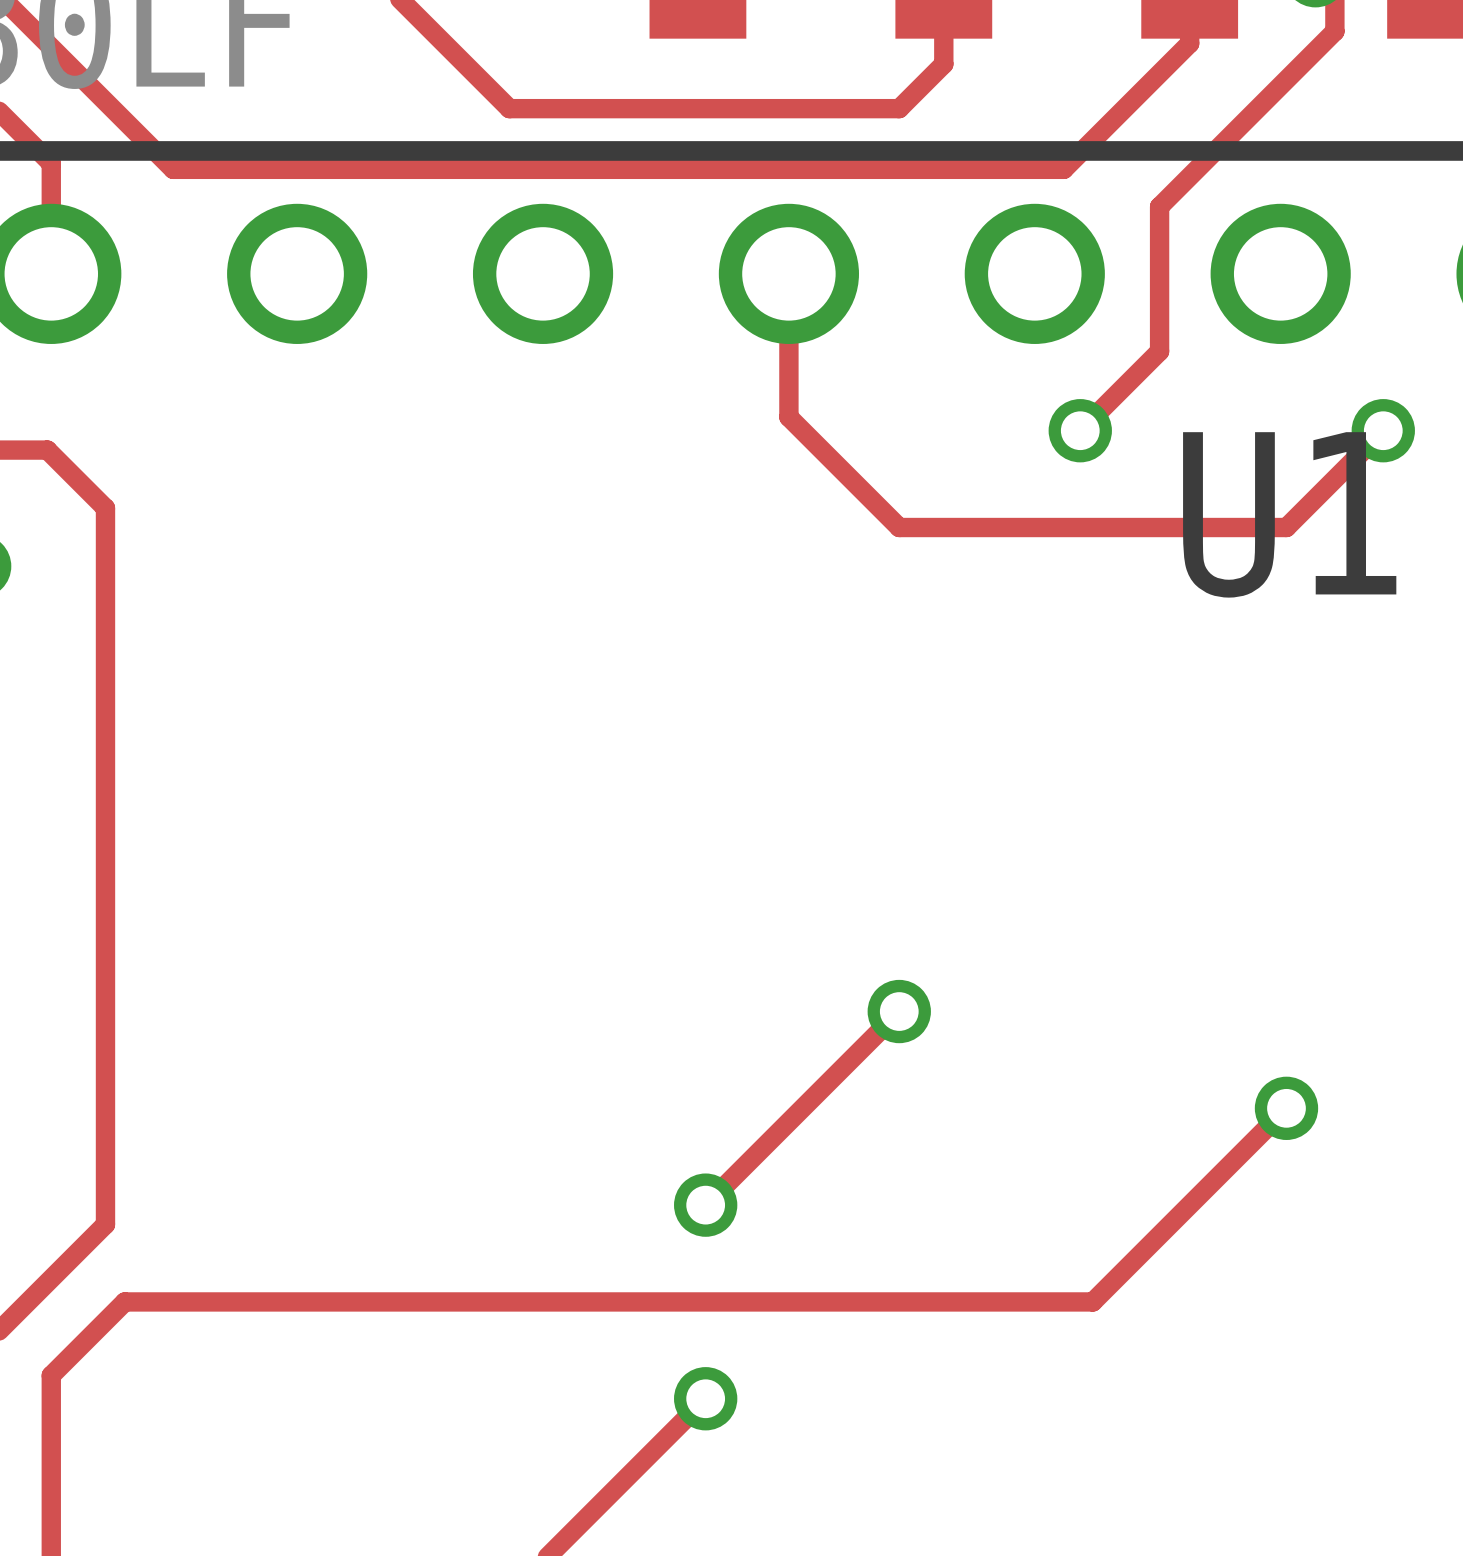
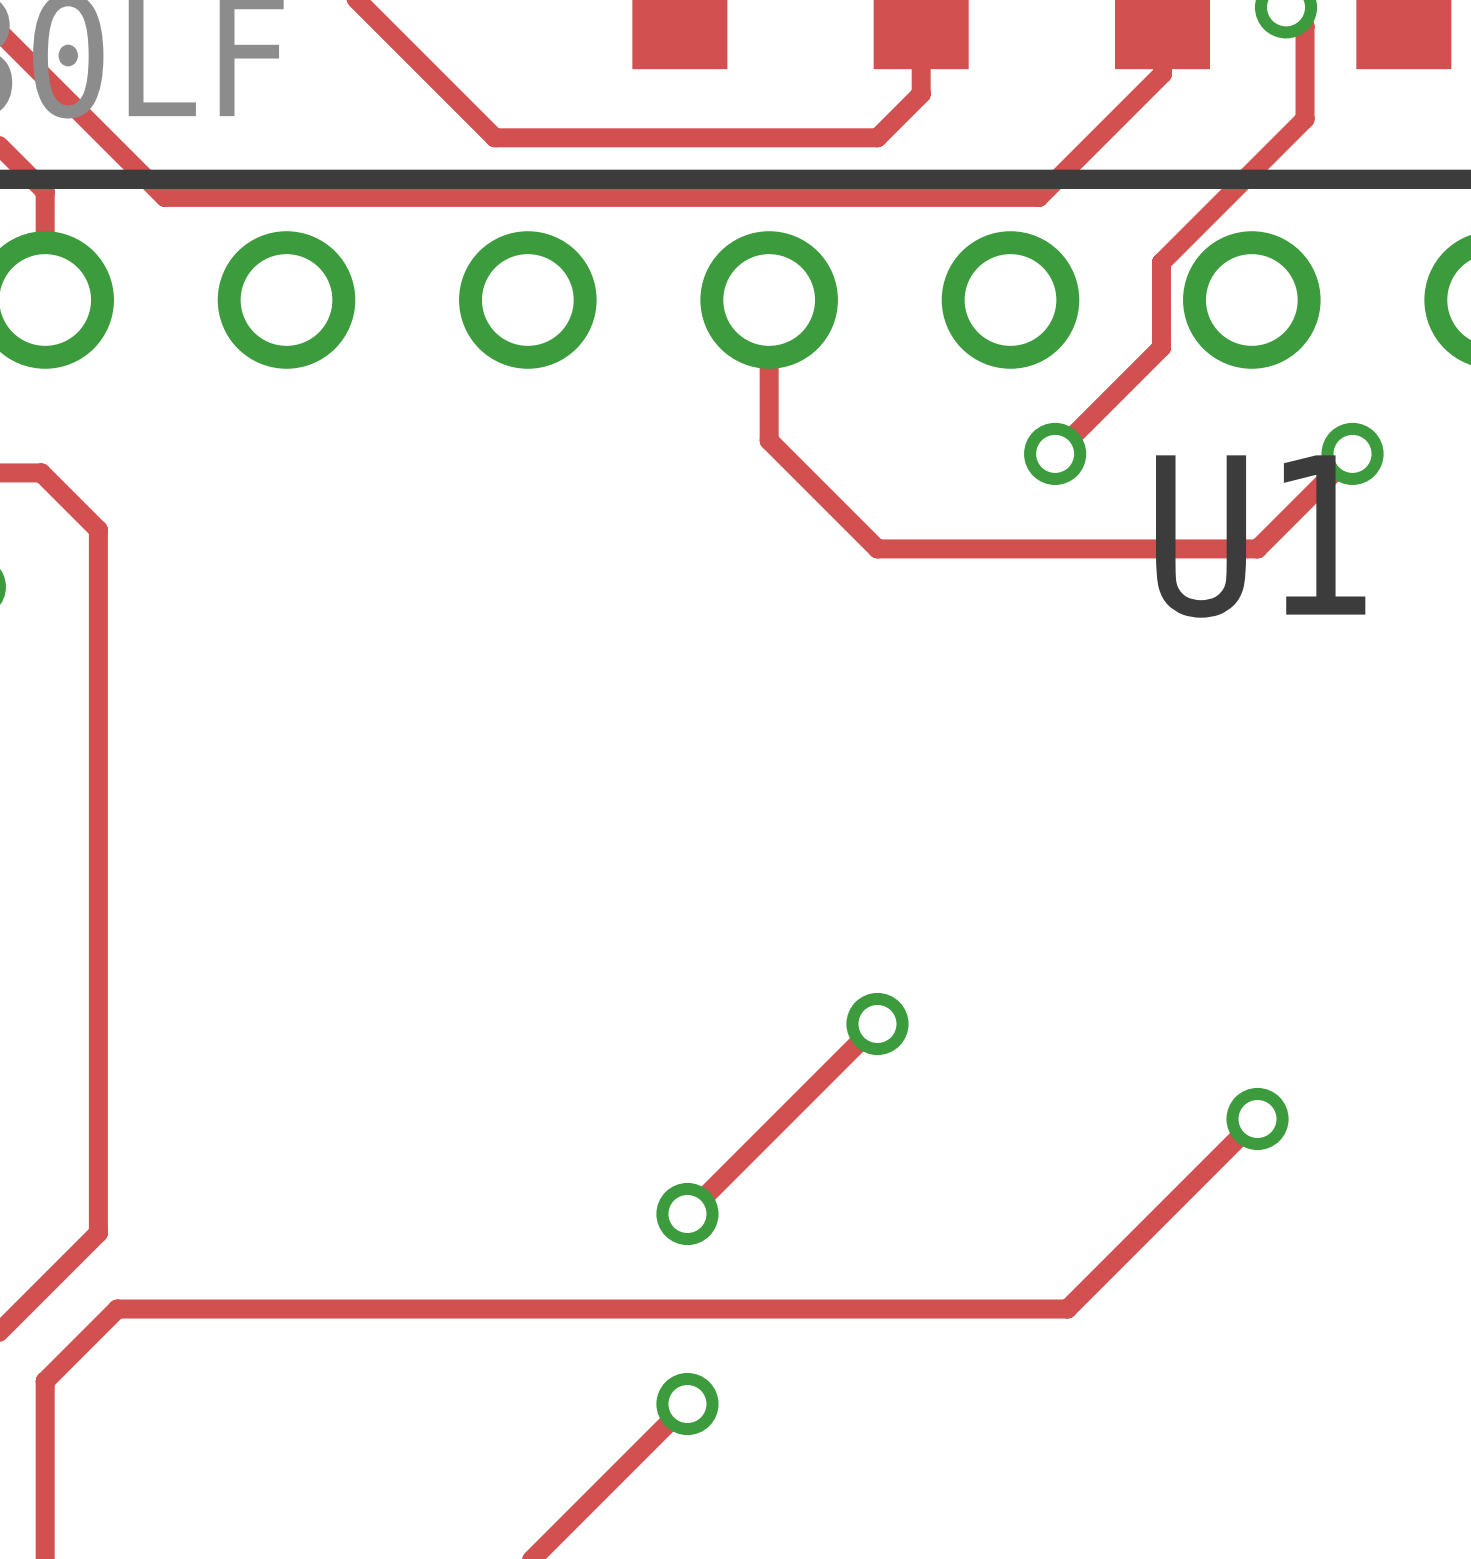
track: (1334, 31) (1159, 206) (1159, 351) -> (1305, 62) (1305, 119) (1161, 262) (1161, 347) (1132, 376)

